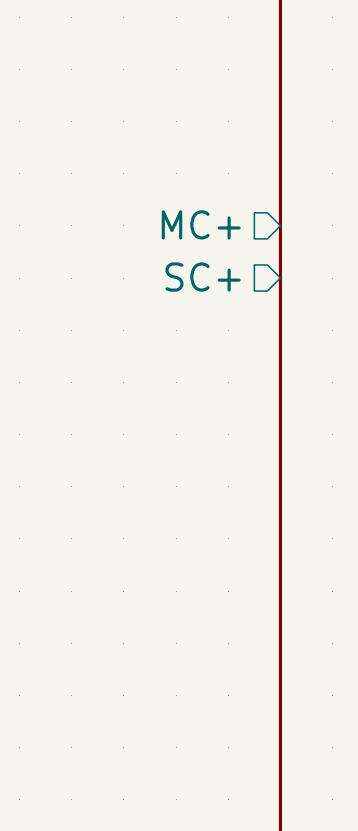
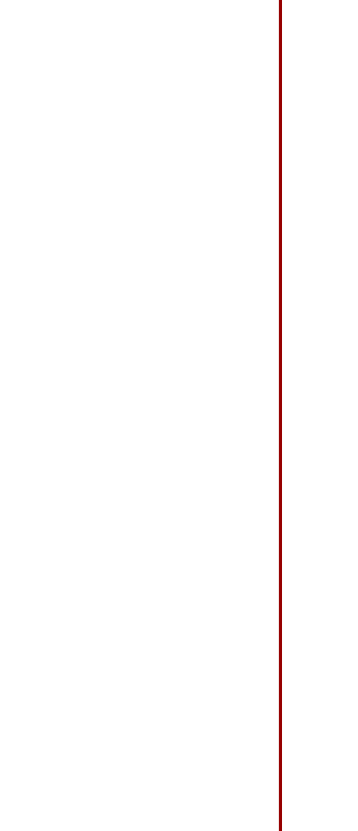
sheet pin: MC+ (201, 224) -> none
sheet pin: SC+ (203, 277) -> none

